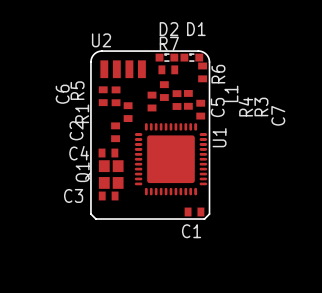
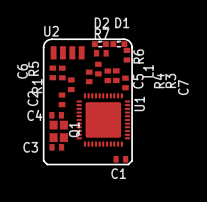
Q1 name position: Q1 (83, 172) -> Q1 (74, 129)

